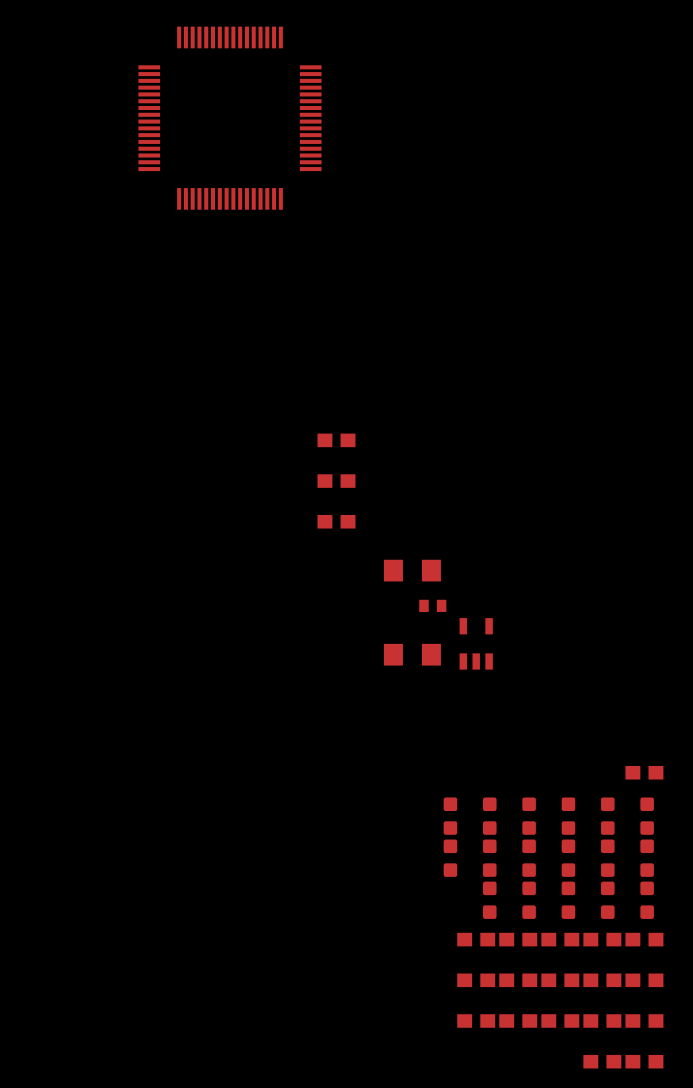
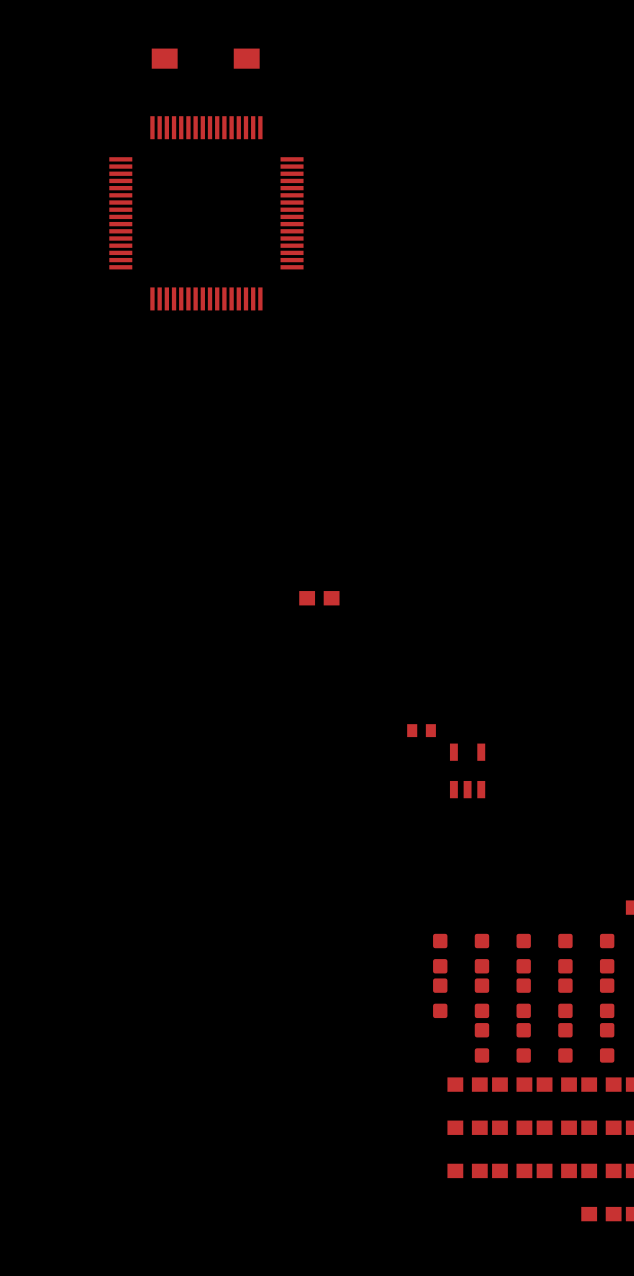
part: (336, 440) -> none
part: (336, 521) -> none
part: (412, 570) -> none
part: (412, 654) -> none

